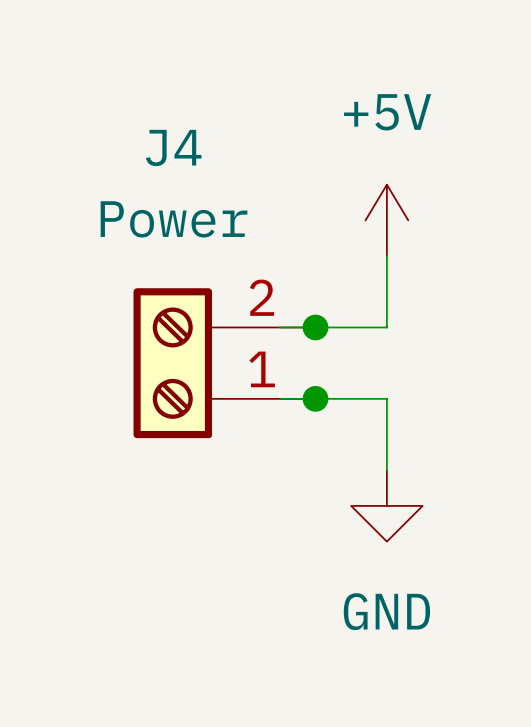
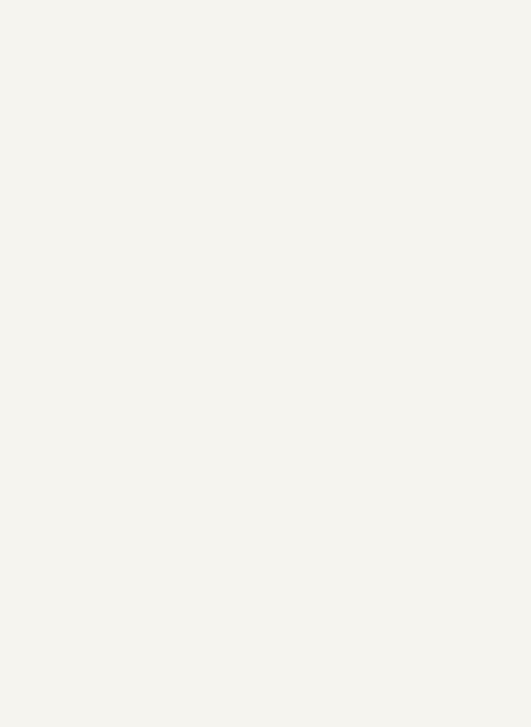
power symbol: +5V (386, 220) -> none
wire: (386, 256) (386, 327) (279, 327) -> none
junction: (315, 327) -> none
J4: Power (224, 363) -> none
wire: (279, 398) (386, 398) (386, 470) -> none
junction: (315, 398) -> none
power symbol: GND (386, 505) -> none

